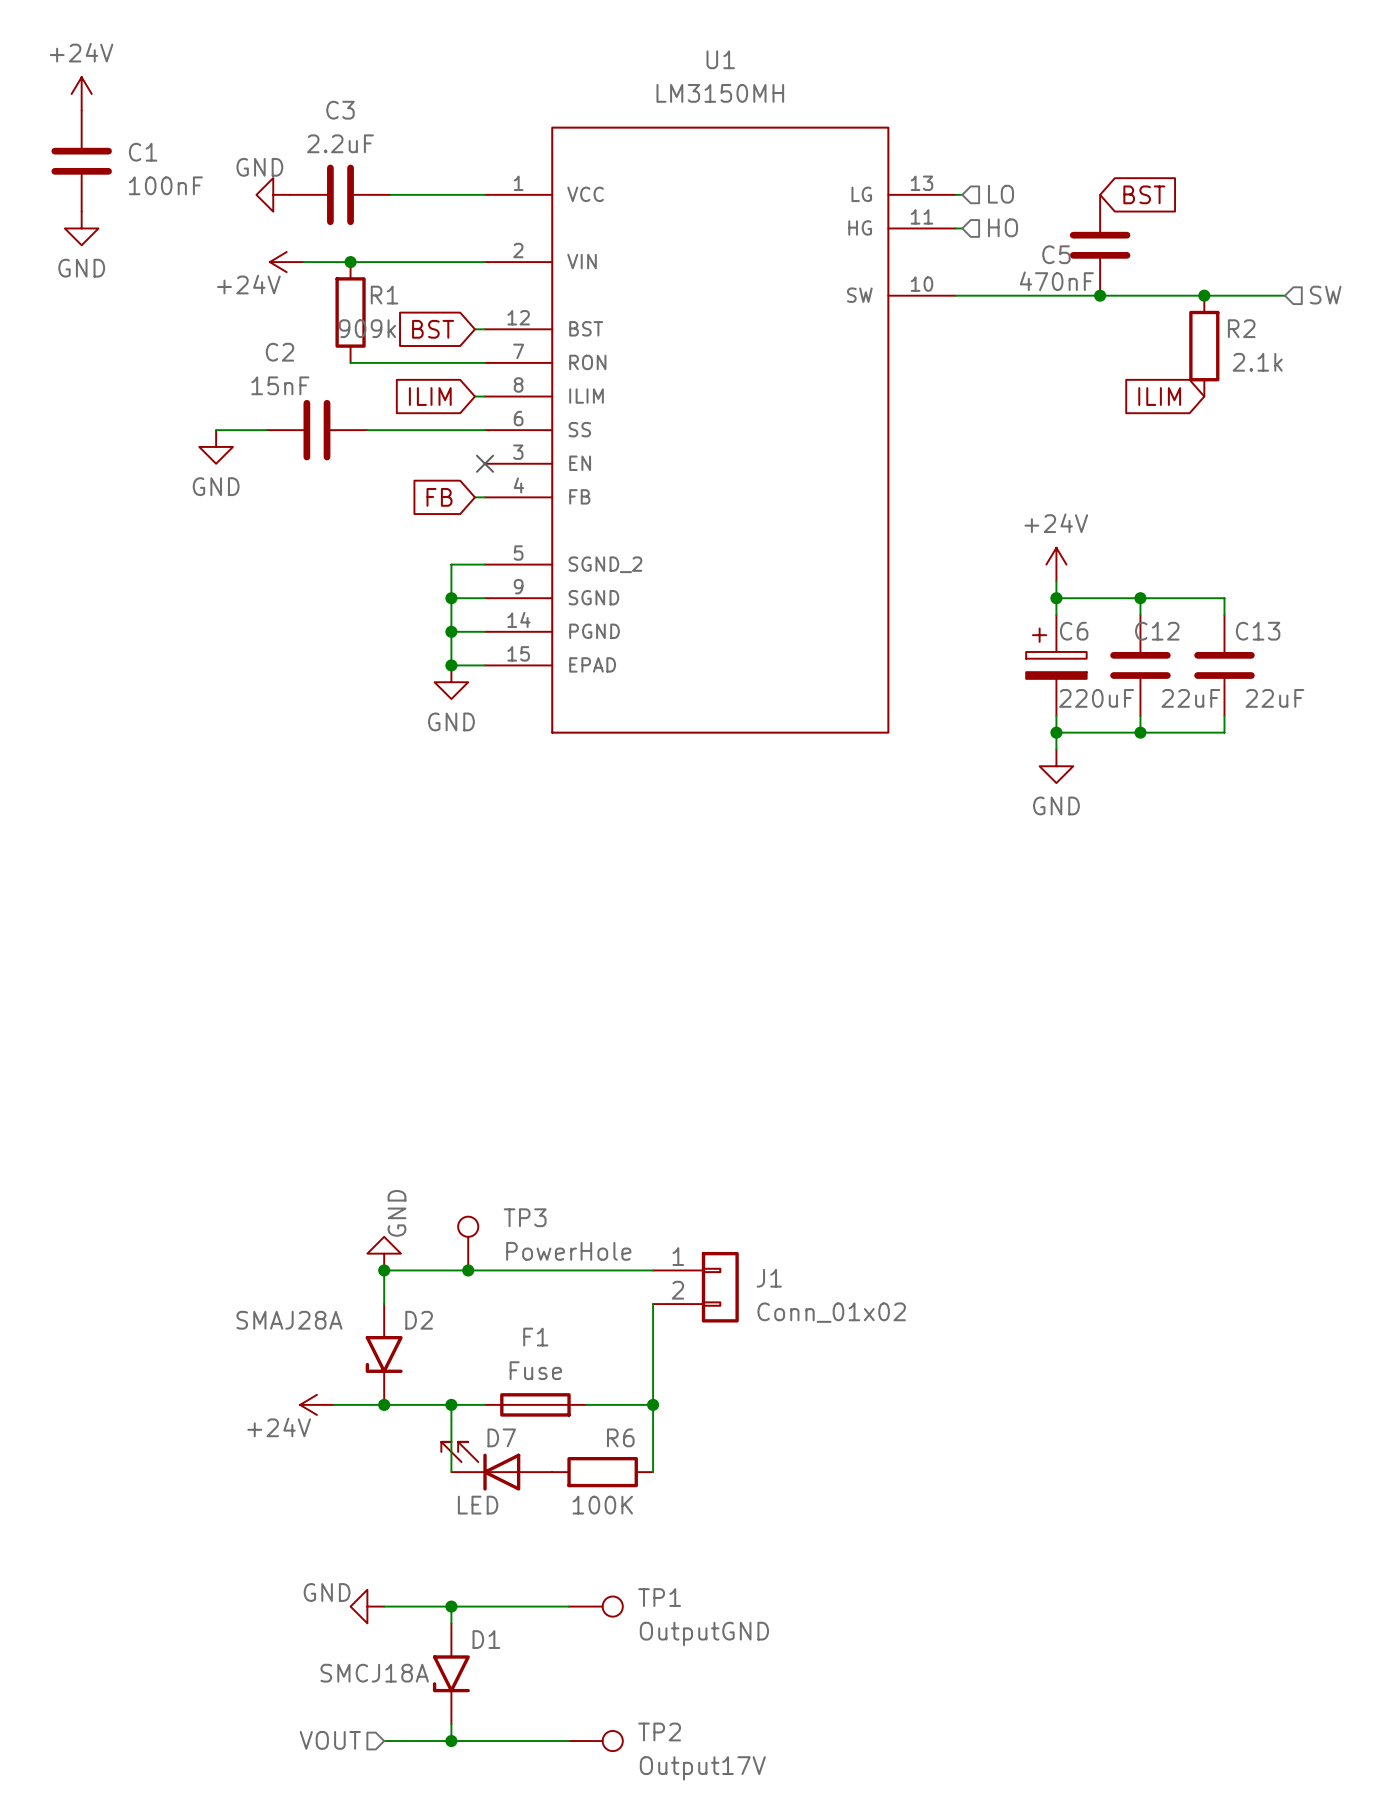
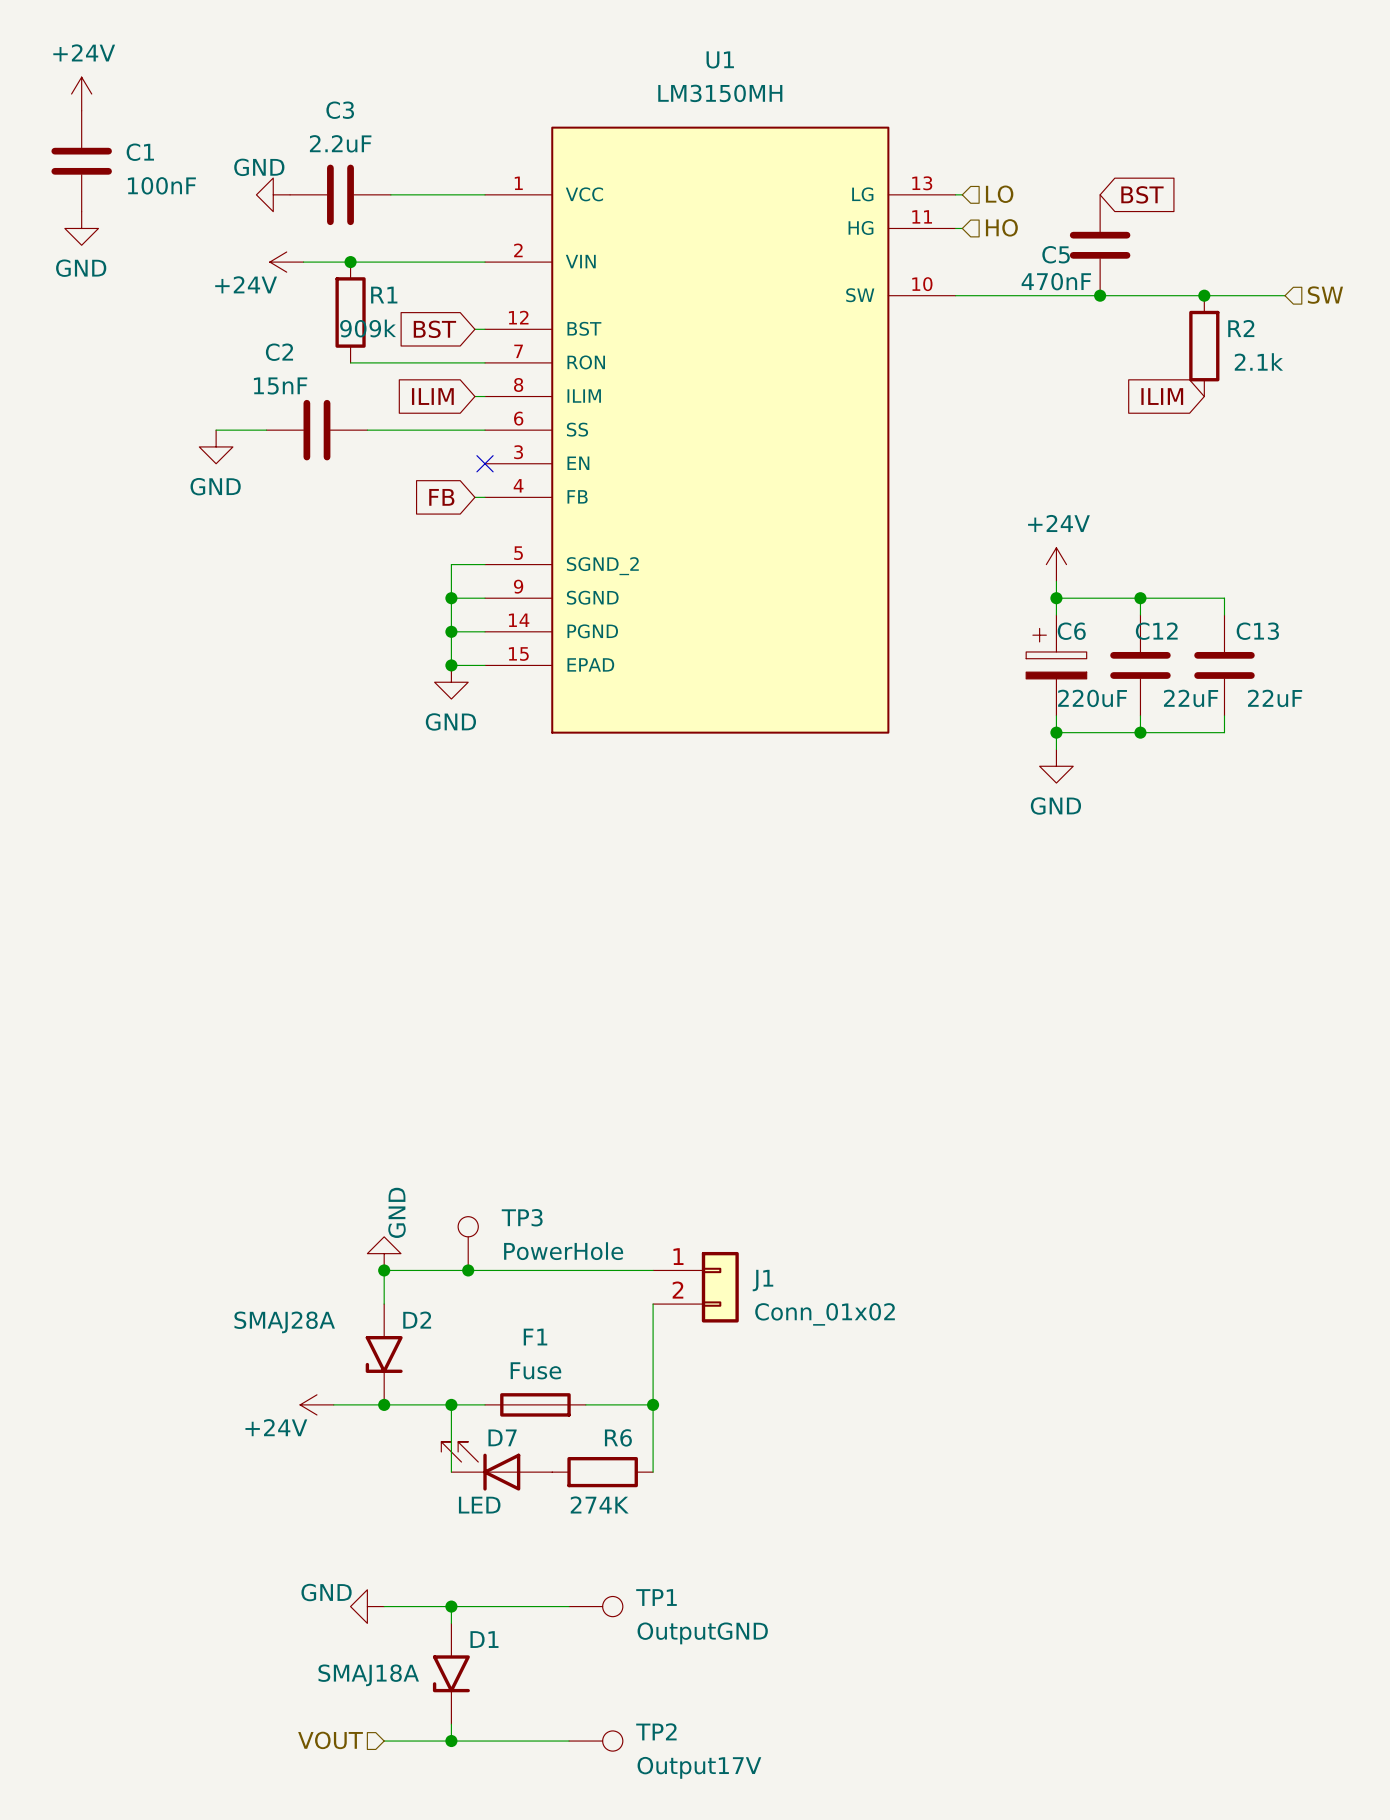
R6 value: 100K (602, 1505) -> 274K (599, 1504)
D1 value: SMCJ18A (374, 1673) -> SMAJ18A (368, 1675)

